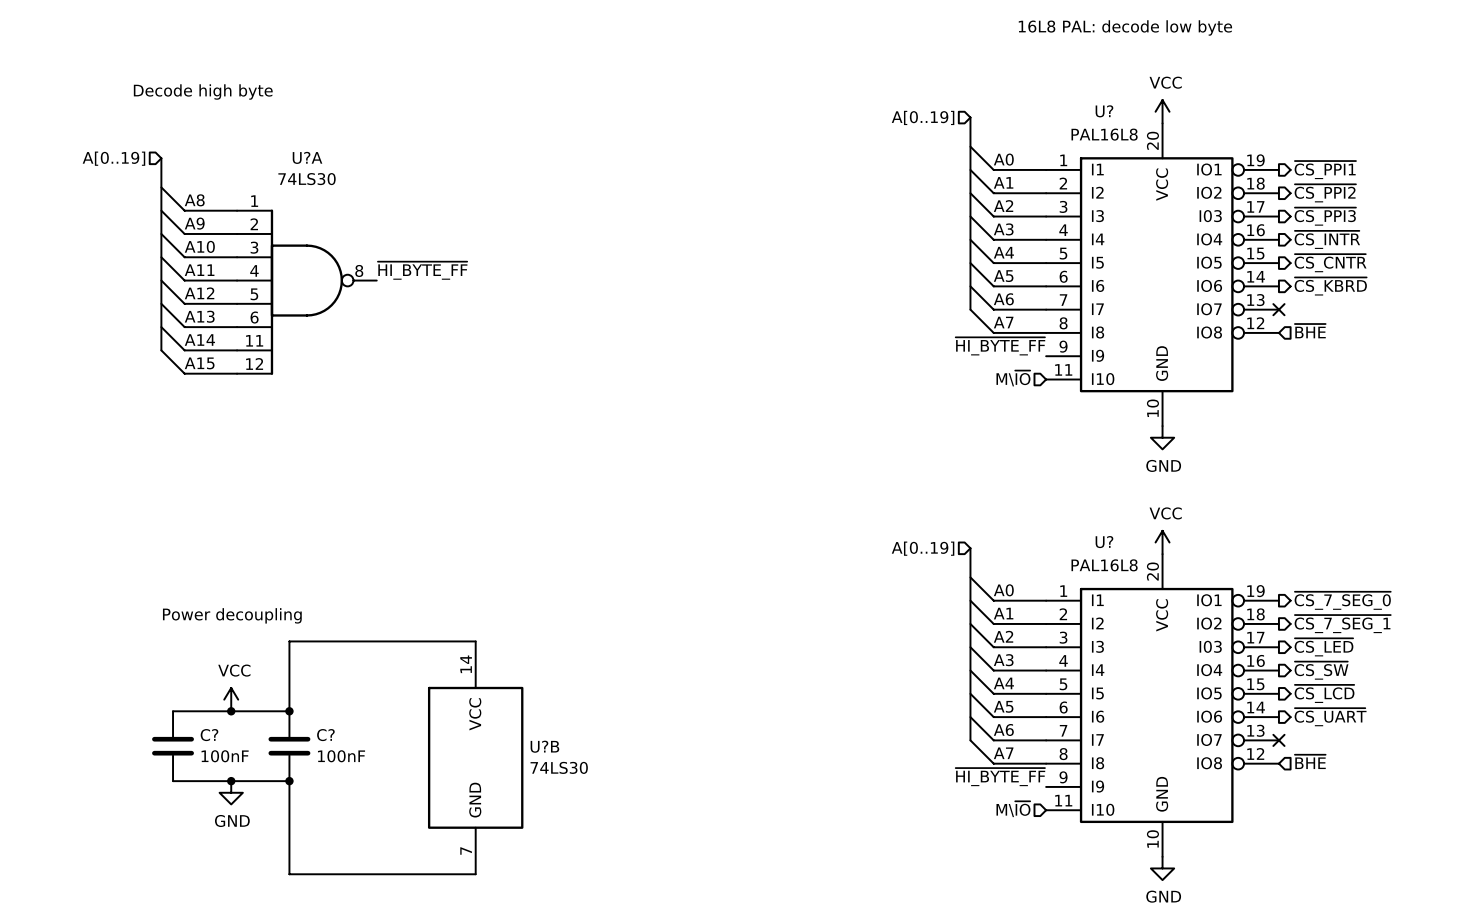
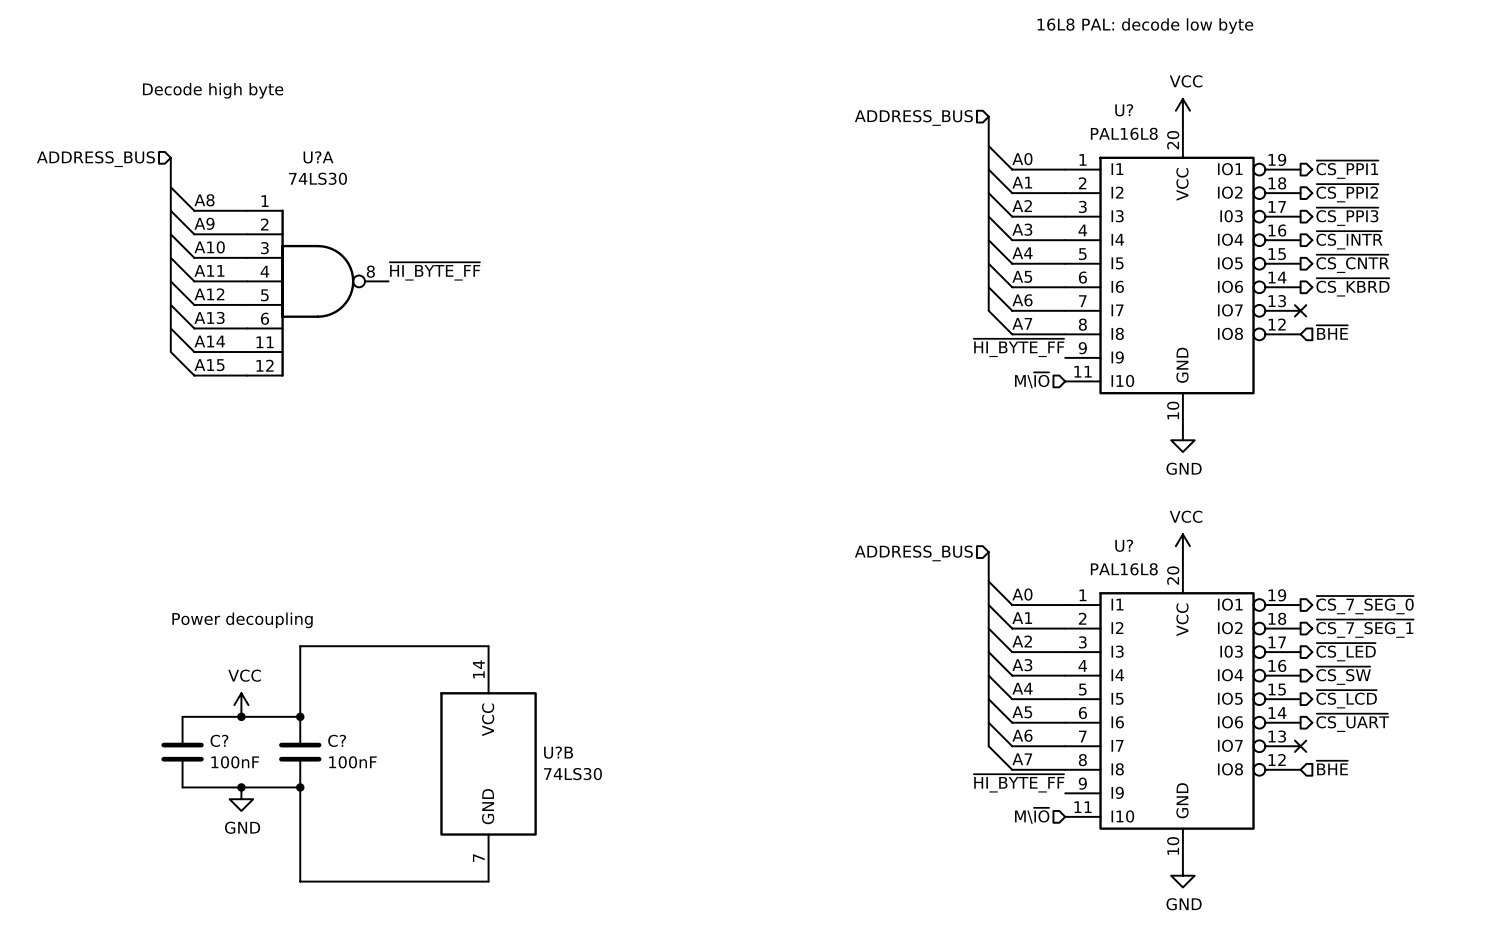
hierarchical label: A[0..19] (923, 117) -> ADDRESS_BUS (913, 117)
hierarchical label: A[0..19] (113, 158) -> ADDRESS_BUS (95, 159)
hierarchical label: A[0..19] (923, 548) -> ADDRESS_BUS (913, 553)

